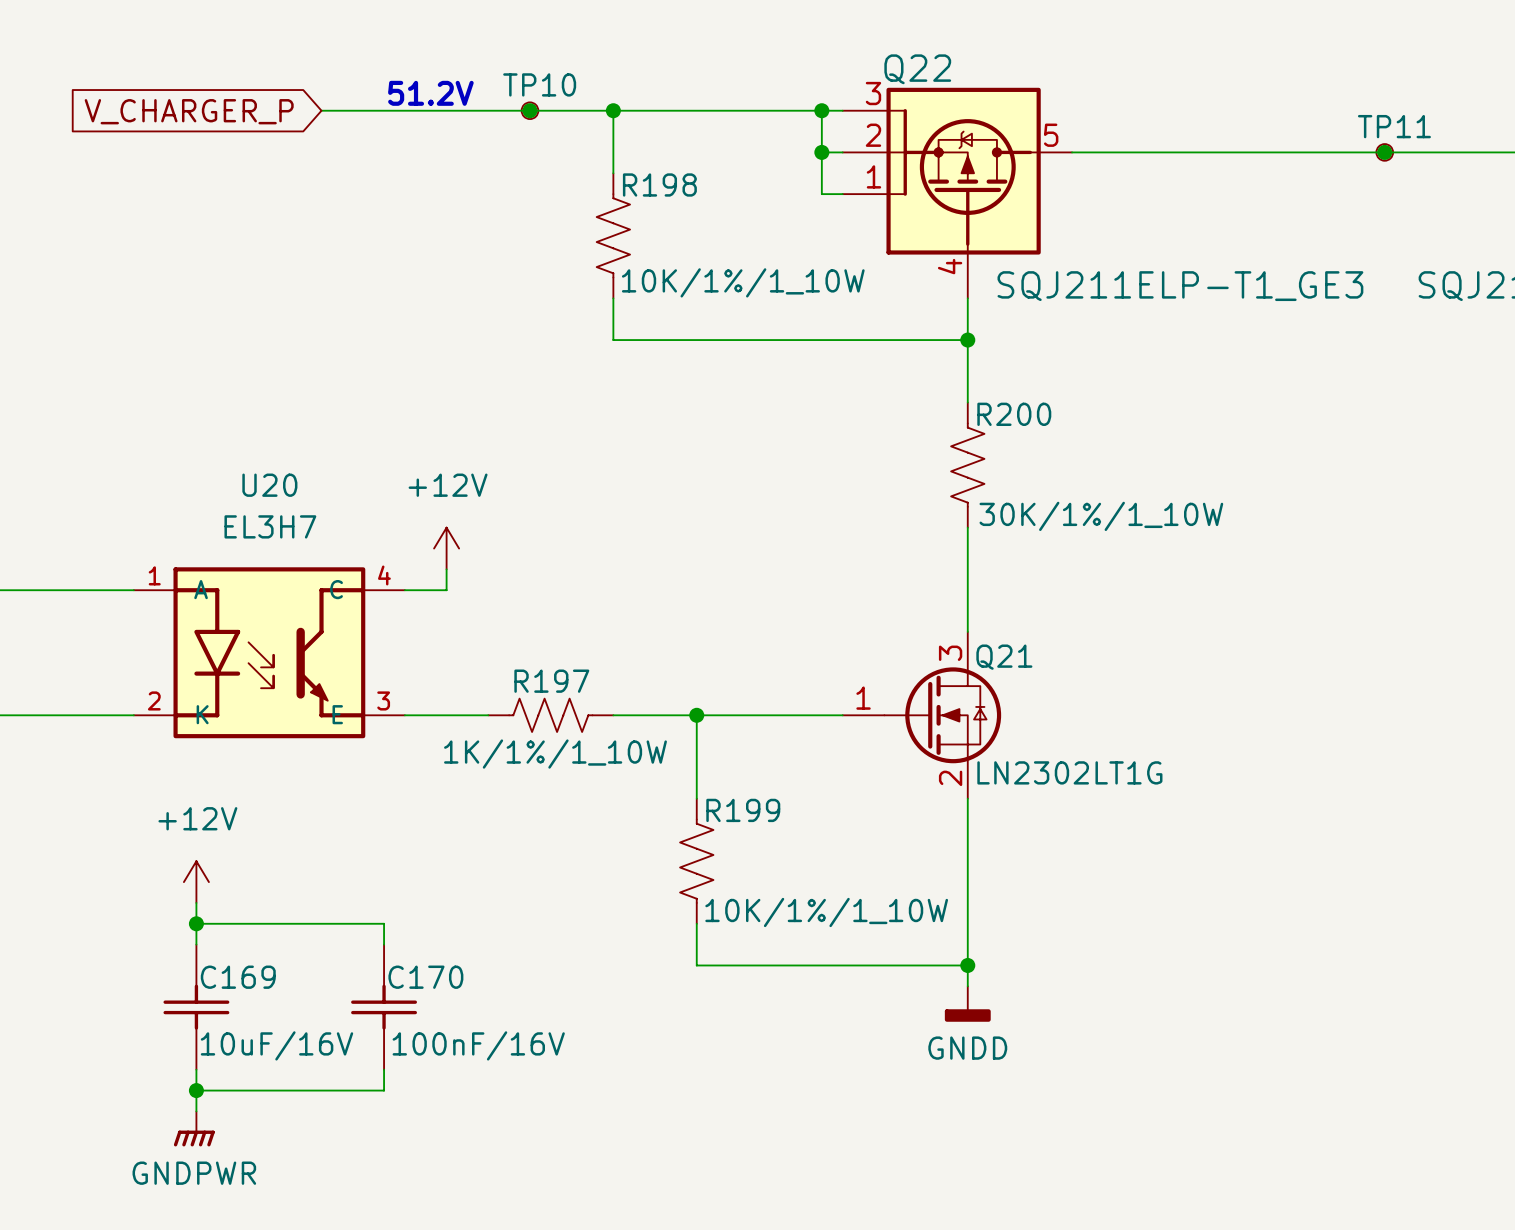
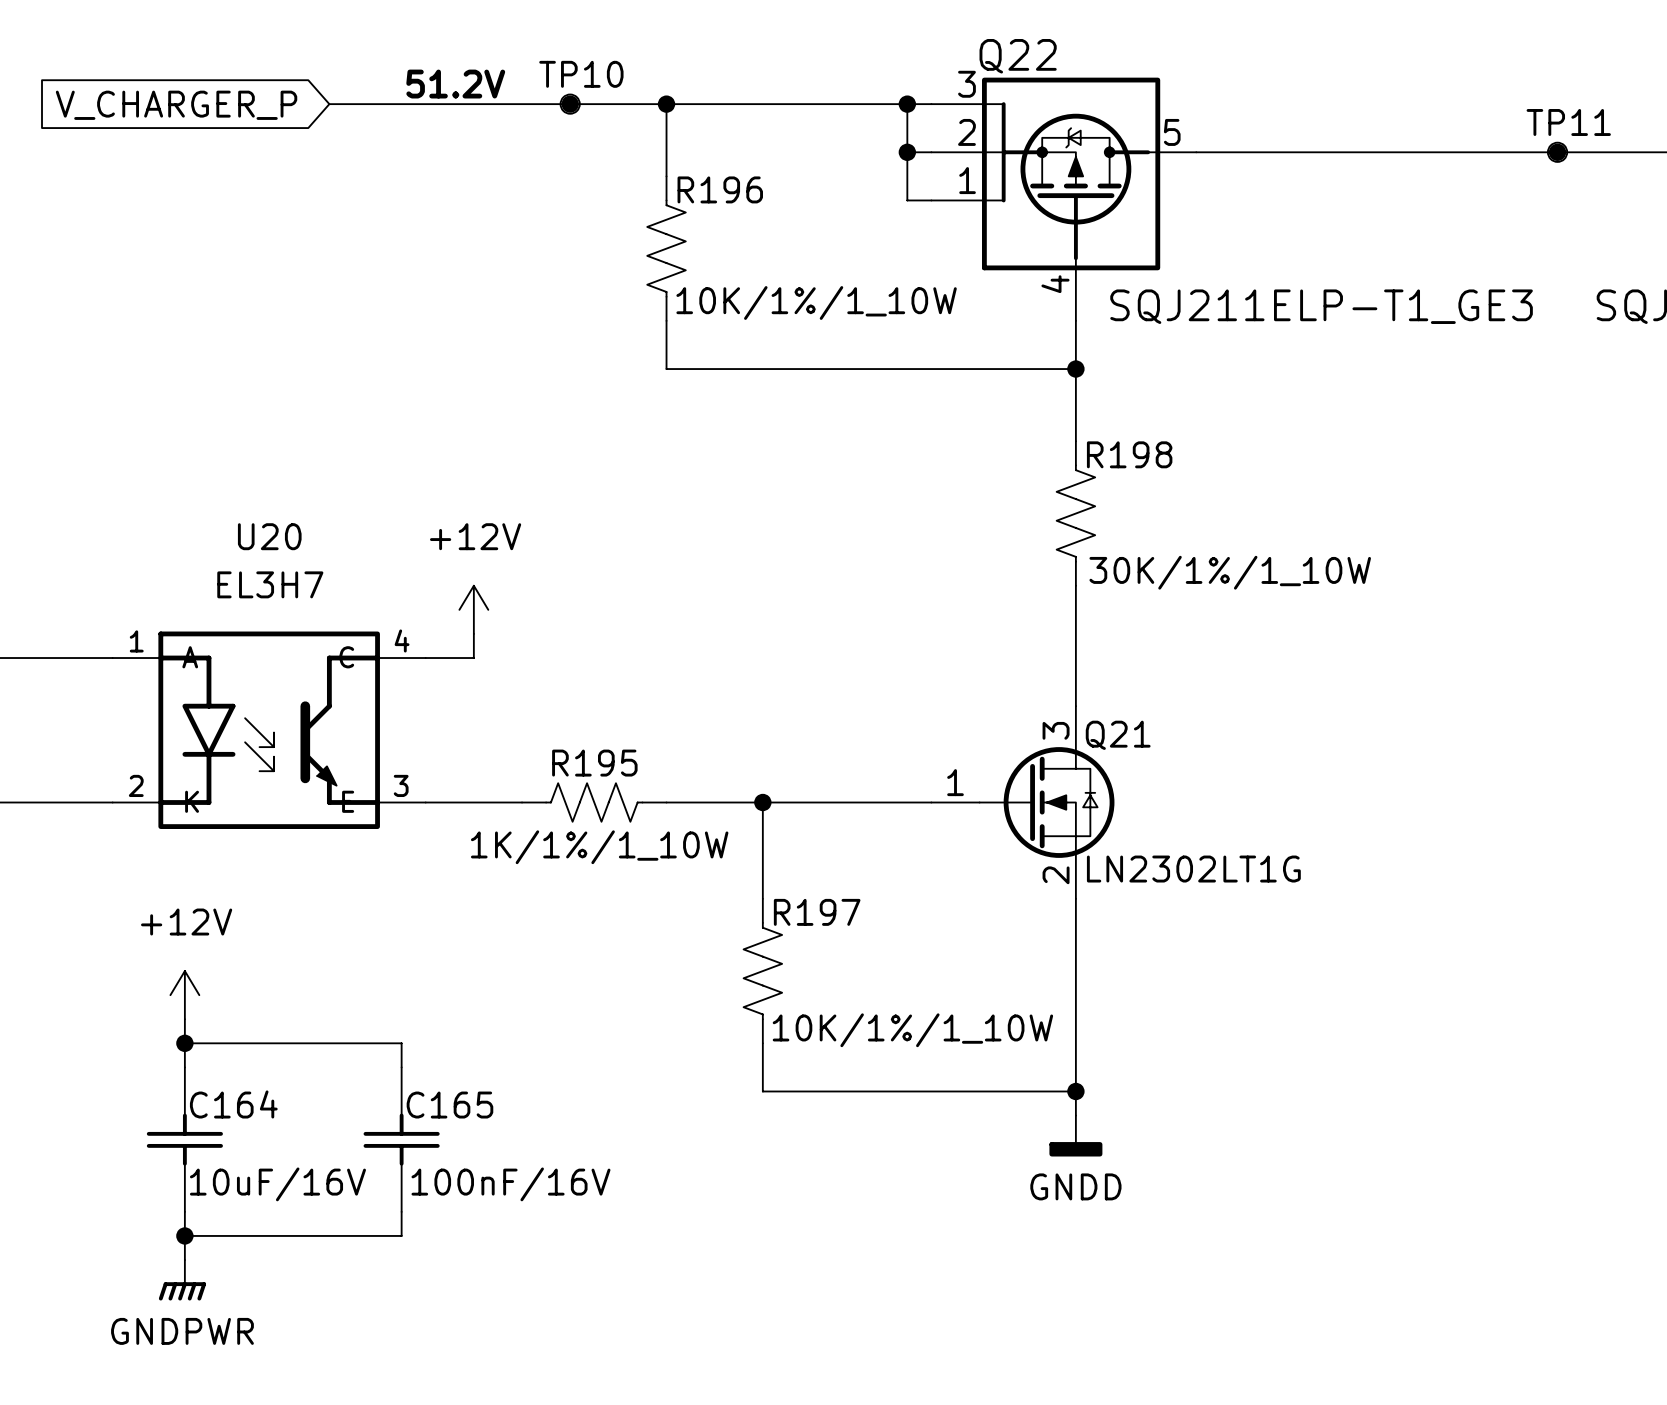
R198 name: R198 (659, 184) -> R196 (720, 189)
R200 name: R200 (1014, 414) -> R198 (1129, 454)
R197 name: R197 (551, 681) -> R195 (594, 763)
R199 name: R199 (743, 810) -> R197 (817, 912)
C169 name: C169 (238, 977) -> C164 (233, 1104)
C170 name: C170 (425, 977) -> C165 (449, 1105)

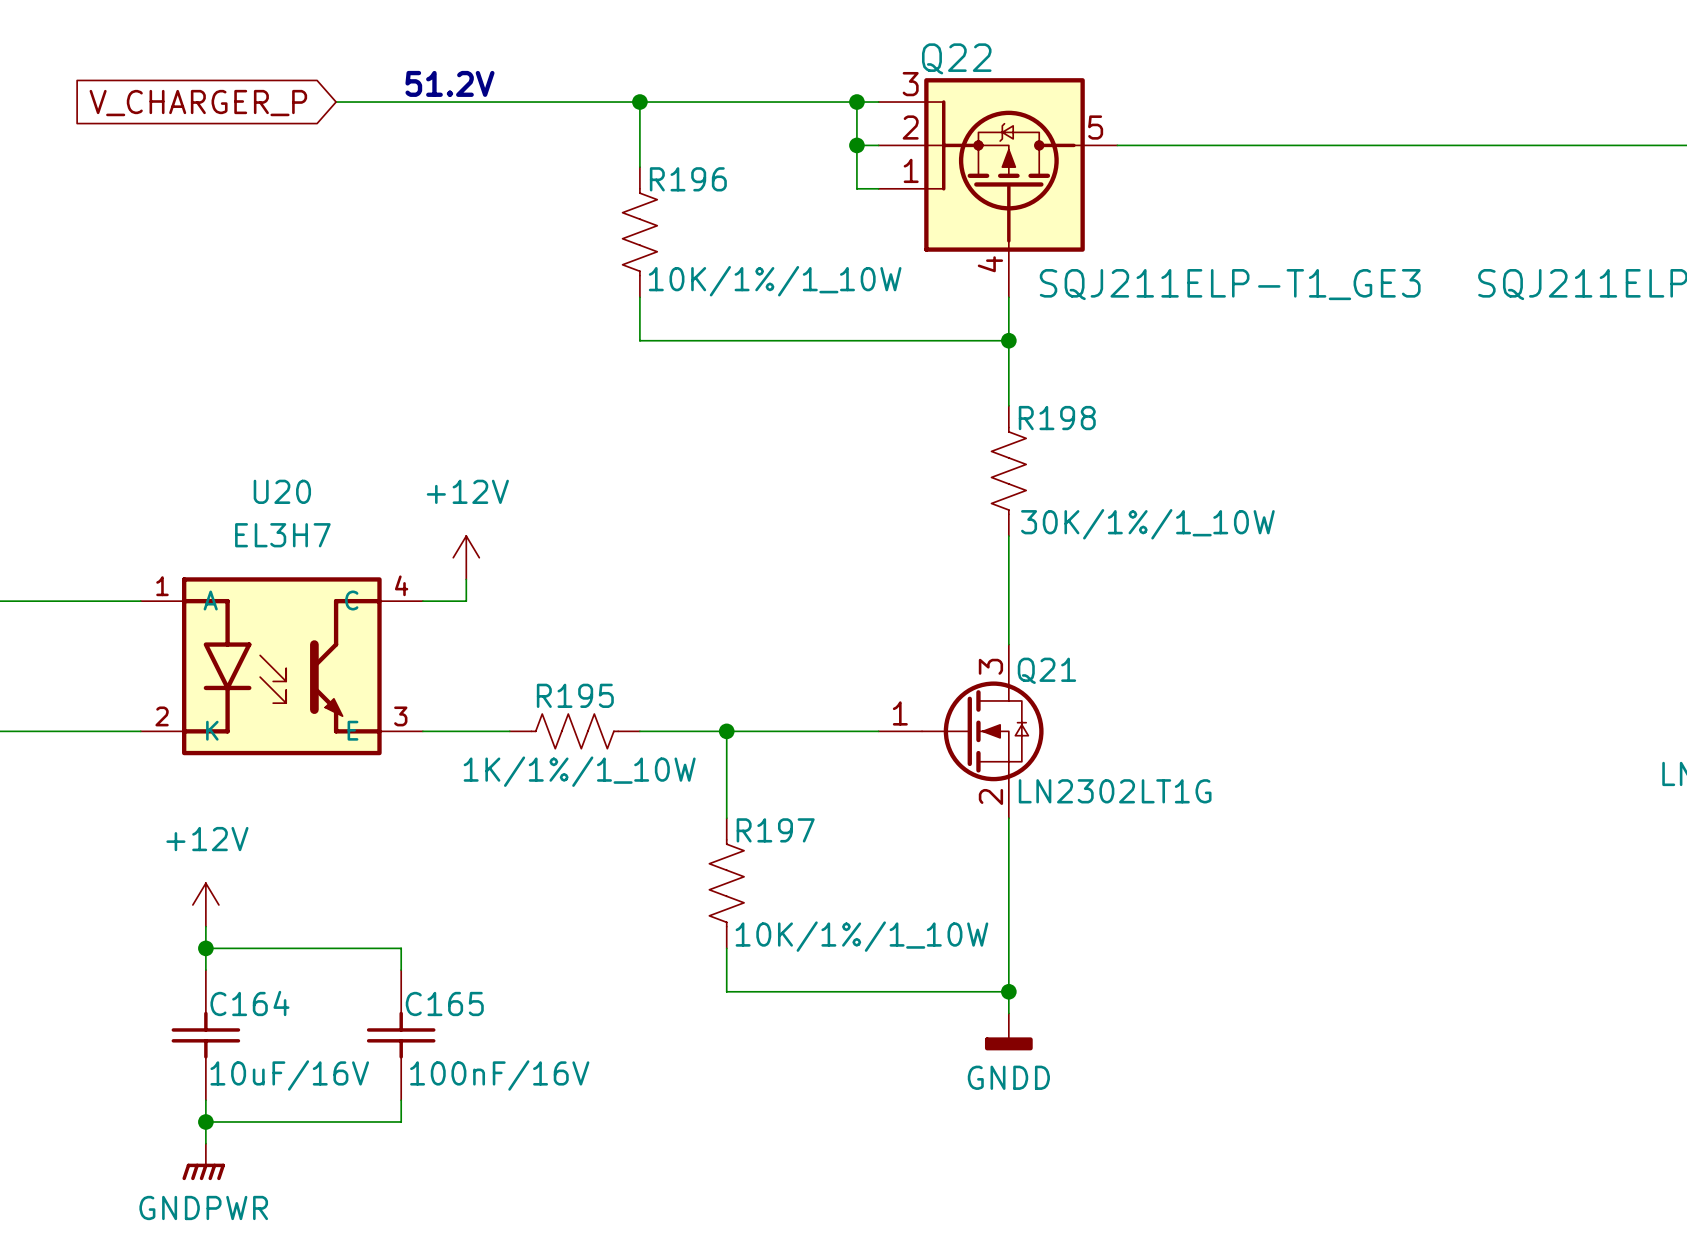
junction: (570, 104) -> none
TP10: (570, 104) -> none
junction: (1557, 152) -> none
TP11: (1557, 152) -> none

